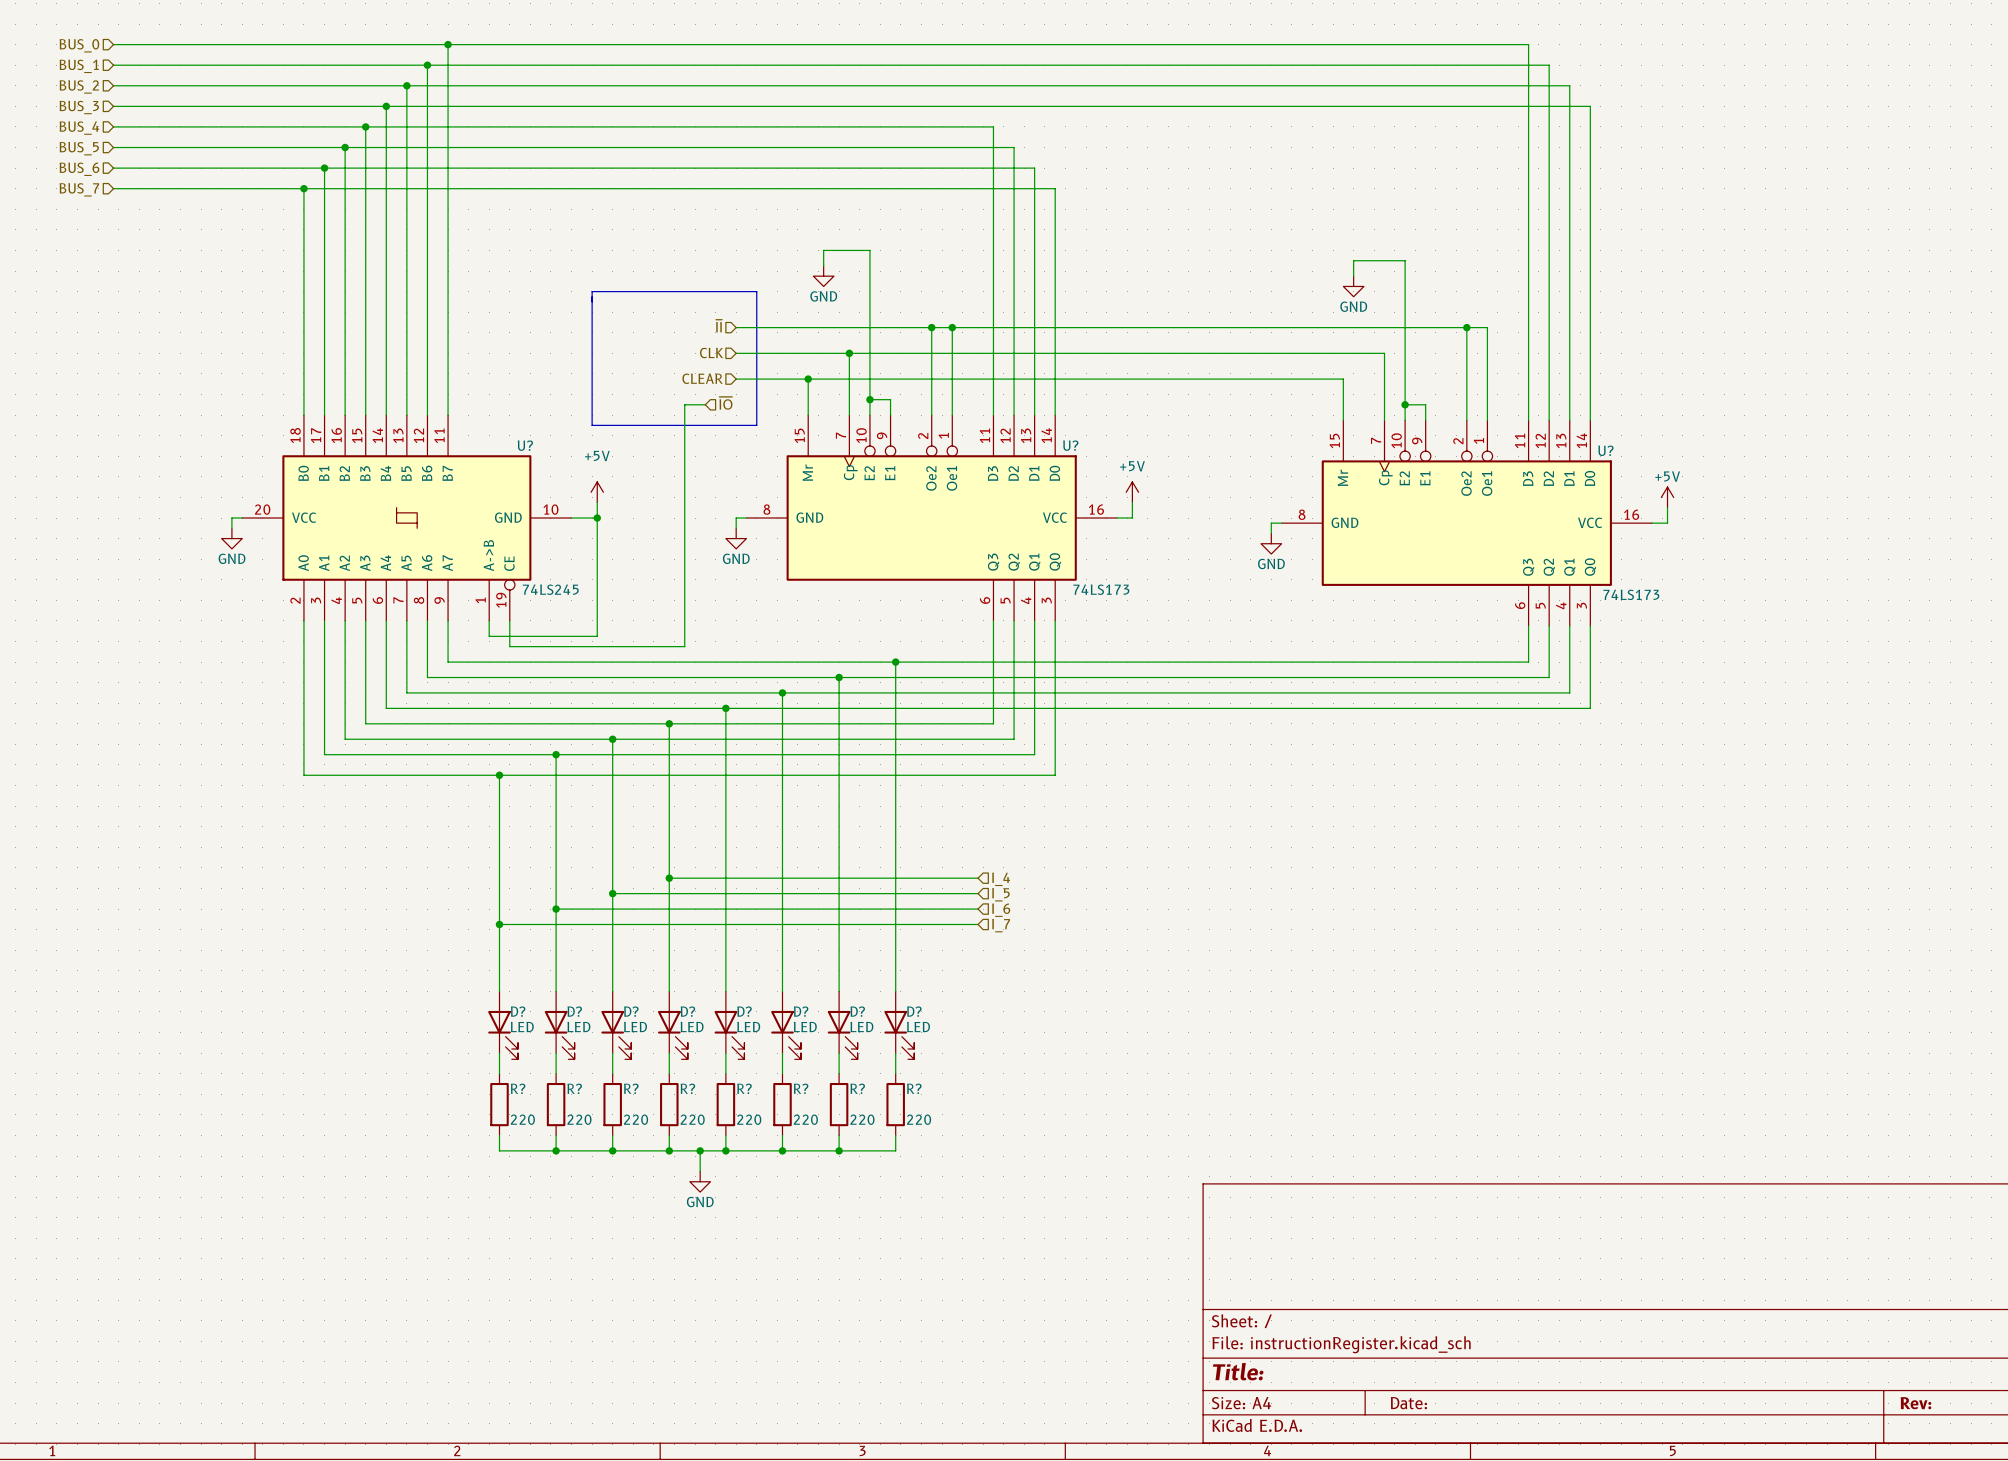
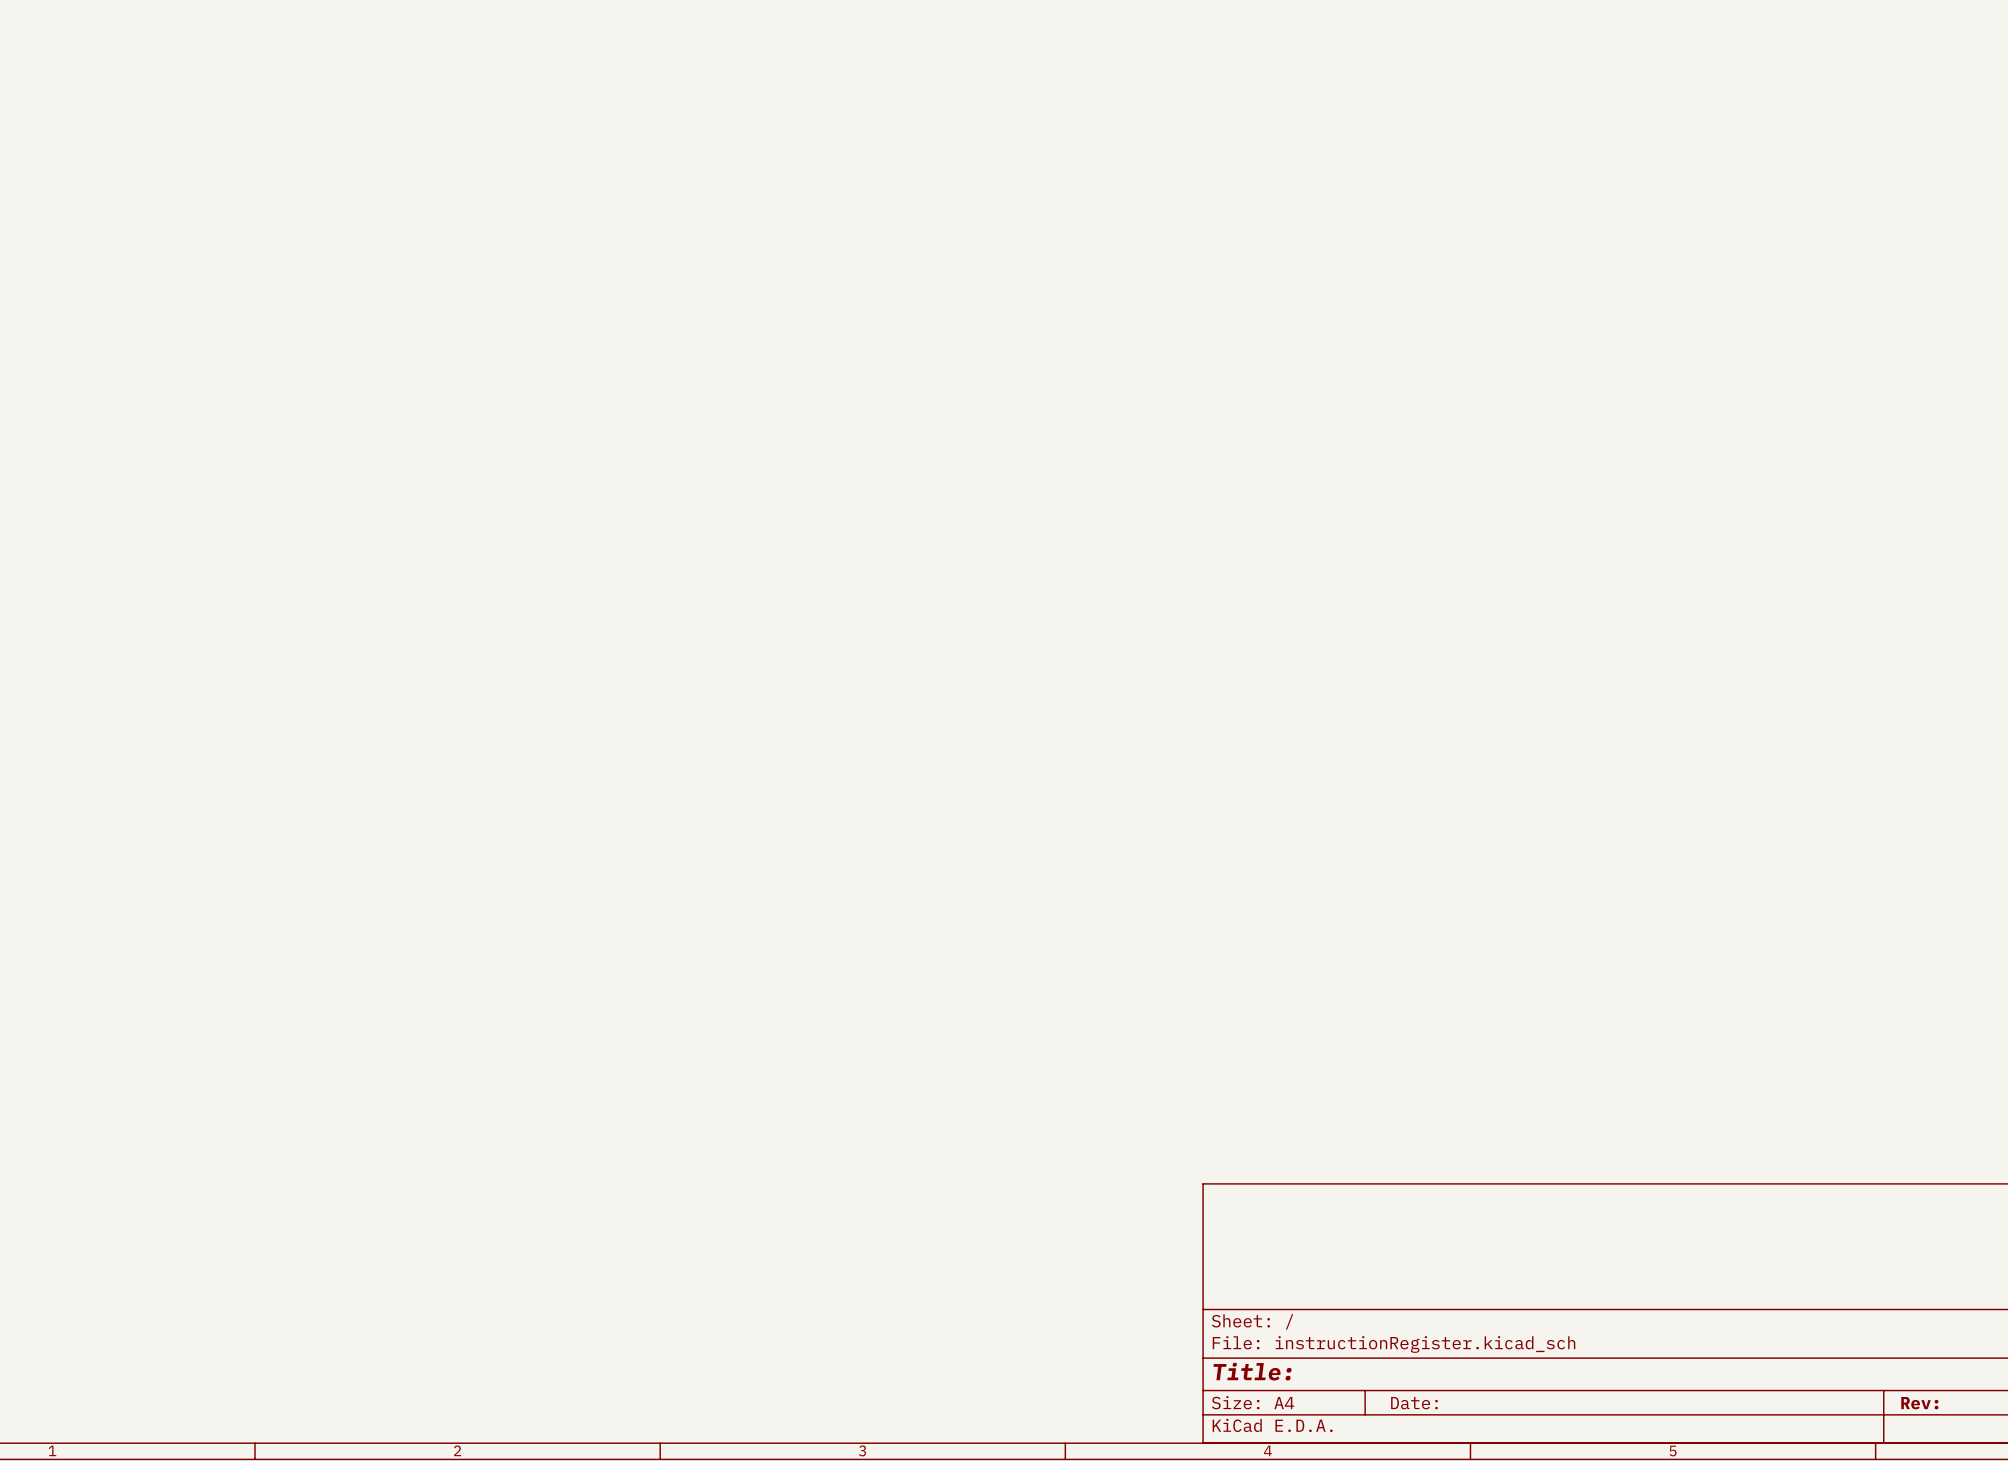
wire: (113, 44) (1528, 44) (1528, 420) -> none
wire: (448, 44) (448, 415) -> none
junction: (448, 44) -> none
hierarchical label: BUS_0 (79, 45) -> none
wire: (113, 65) (1549, 65) (1549, 420) -> none
wire: (427, 65) (427, 415) -> none
junction: (427, 65) -> none
hierarchical label: BUS_1 (79, 66) -> none
wire: (113, 85) (1569, 85) (1569, 420) -> none
wire: (406, 85) (406, 415) -> none
junction: (406, 85) -> none
hierarchical label: BUS_2 (79, 86) -> none
wire: (113, 106) (1590, 106) (1590, 420) -> none
wire: (386, 106) (386, 415) -> none
junction: (386, 106) -> none
hierarchical label: BUS_3 (79, 107) -> none
wire: (113, 126) (993, 126) (993, 415) -> none
wire: (365, 126) (365, 415) -> none
junction: (365, 126) -> none
hierarchical label: BUS_4 (79, 128) -> none
wire: (113, 147) (1014, 147) (1014, 415) -> none
wire: (345, 147) (345, 415) -> none
junction: (345, 147) -> none
hierarchical label: BUS_5 (79, 148) -> none
wire: (113, 168) (1034, 168) (1034, 415) -> none
wire: (324, 168) (324, 415) -> none
junction: (324, 168) -> none
hierarchical label: BUS_6 (79, 169) -> none
wire: (113, 188) (1055, 188) (1055, 415) -> none
wire: (303, 188) (303, 415) -> none
junction: (303, 188) -> none
hierarchical label: BUS_7 (79, 189) -> none
wire: (823, 265) (823, 250) (869, 250) (869, 415) -> none
power symbol: GND (823, 276) -> none
wire: (1353, 276) (1353, 260) (1405, 260) (1405, 420) -> none
power symbol: GND (1353, 286) -> none
line: (592, 291) (756, 291) (756, 425) (592, 425) (592, 291) -> none
hierarchical label: ~{II} (719, 326) -> none
wire: (736, 327) (1487, 327) (1487, 420) -> none
wire: (931, 327) (931, 415) -> none
junction: (931, 327) -> none
wire: (952, 327) (952, 415) -> none
junction: (952, 327) -> none
wire: (1466, 327) (1466, 420) -> none
junction: (1466, 327) -> none
hierarchical label: CLK (711, 353) -> none
wire: (736, 353) (1384, 353) (1384, 420) -> none
wire: (849, 353) (849, 415) -> none
junction: (849, 353) -> none
hierarchical label: CLEAR (702, 378) -> none
wire: (736, 379) (1343, 379) (1343, 420) -> none
wire: (808, 379) (808, 415) -> none
junction: (808, 379) -> none
wire: (869, 399) (890, 399) (890, 415) -> none
junction: (869, 399) -> none
hierarchical label: ~{IO} (725, 403) -> none
wire: (705, 404) (684, 404) (684, 646) (509, 646) (509, 620) -> none
wire: (1405, 404) (1425, 404) (1425, 420) -> none
junction: (1405, 404) -> none
power symbol: +5V (597, 492) -> none
power symbol: +5V (1132, 492) -> none
power symbol: +5V (1667, 497) -> none
wire: (597, 502) (597, 636) (489, 636) (489, 620) -> none
wire: (1132, 502) (1132, 518) (1116, 518) -> none
wire: (1667, 507) (1667, 523) (1652, 523) -> none
wire: (242, 518) (231, 518) (231, 528) -> none
U?: 74LS245 (406, 518) -> none
wire: (571, 518) (597, 518) -> none
junction: (597, 518) -> none
wire: (746, 518) (736, 518) (736, 528) -> none
U?: 74LS173 (931, 518) -> none
wire: (1281, 523) (1271, 523) (1271, 533) -> none
U?: 74LS173 (1466, 523) -> none
power symbol: GND (231, 538) -> none
power symbol: GND (736, 538) -> none
power symbol: GND (1271, 543) -> none
wire: (303, 620) (303, 775) (1055, 775) (1055, 620) -> none
wire: (324, 620) (324, 754) (1034, 754) (1034, 620) -> none
wire: (345, 620) (345, 739) (1014, 739) (1014, 620) -> none
wire: (365, 620) (365, 723) (993, 723) (993, 620) -> none
wire: (386, 620) (386, 708) (1590, 708) (1590, 626) -> none
wire: (406, 620) (406, 692) (1569, 692) (1569, 626) -> none
wire: (427, 620) (427, 677) (1549, 677) (1549, 626) -> none
wire: (448, 620) (448, 662) (1528, 662) (1528, 626) -> none
wire: (895, 662) (895, 991) -> none
junction: (895, 662) -> none
wire: (839, 677) (839, 991) -> none
junction: (839, 677) -> none
wire: (782, 692) (782, 991) -> none
junction: (782, 692) -> none
wire: (725, 708) (725, 991) -> none
junction: (725, 708) -> none
wire: (669, 723) (669, 991) -> none
junction: (669, 723) -> none
wire: (612, 739) (612, 991) -> none
junction: (612, 739) -> none
wire: (556, 754) (556, 909) -> none
junction: (556, 754) -> none
wire: (499, 775) (499, 991) -> none
junction: (499, 775) -> none
wire: (669, 878) (978, 878) -> none
junction: (669, 878) -> none
hierarchical label: I_4 (1001, 879) -> none
wire: (612, 893) (978, 893) -> none
junction: (612, 893) -> none
hierarchical label: I_5 (1000, 894) -> none
wire: (556, 909) (556, 991) -> none
wire: (556, 909) (978, 909) -> none
junction: (556, 909) -> none
hierarchical label: I_6 (1001, 910) -> none
wire: (499, 924) (978, 924) -> none
junction: (499, 924) -> none
hierarchical label: I_7 (1001, 925) -> none
D?: LED (503, 1025) -> none
D?: LED (559, 1025) -> none
D?: LED (616, 1025) -> none
D?: LED (672, 1025) -> none
D?: LED (729, 1025) -> none
D?: LED (786, 1025) -> none
D?: LED (842, 1025) -> none
D?: LED (899, 1025) -> none
wire: (499, 1053) (499, 1073) -> none
wire: (556, 1053) (556, 1073) -> none
wire: (612, 1053) (612, 1073) -> none
wire: (669, 1053) (669, 1073) -> none
wire: (725, 1053) (725, 1073) -> none
wire: (782, 1053) (782, 1073) -> none
wire: (839, 1053) (839, 1073) -> none
wire: (895, 1053) (895, 1073) -> none
R?: 220 (499, 1104) -> none
R?: 220 (556, 1104) -> none
R?: 220 (612, 1104) -> none
R?: 220 (669, 1104) -> none
R?: 220 (725, 1104) -> none
R?: 220 (782, 1104) -> none
R?: 220 (839, 1104) -> none
R?: 220 (895, 1104) -> none
wire: (499, 1135) (499, 1150) (895, 1150) (895, 1135) -> none
wire: (556, 1135) (556, 1150) -> none
wire: (612, 1135) (612, 1150) -> none
wire: (669, 1135) (669, 1150) -> none
wire: (725, 1135) (725, 1150) -> none
wire: (782, 1135) (782, 1150) -> none
wire: (839, 1135) (839, 1150) -> none
junction: (556, 1150) -> none
junction: (612, 1150) -> none
junction: (669, 1150) -> none
wire: (700, 1150) (700, 1171) -> none
junction: (700, 1150) -> none
junction: (725, 1150) -> none
junction: (782, 1150) -> none
junction: (839, 1150) -> none
power symbol: GND (700, 1181) -> none

